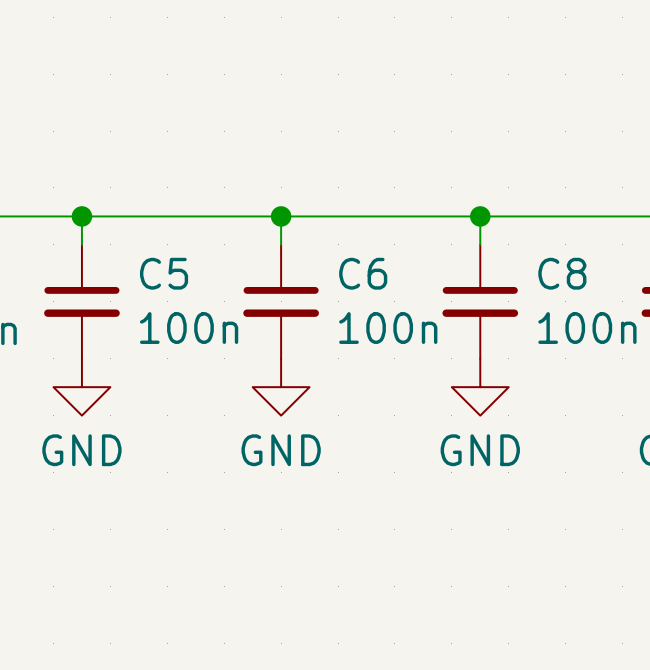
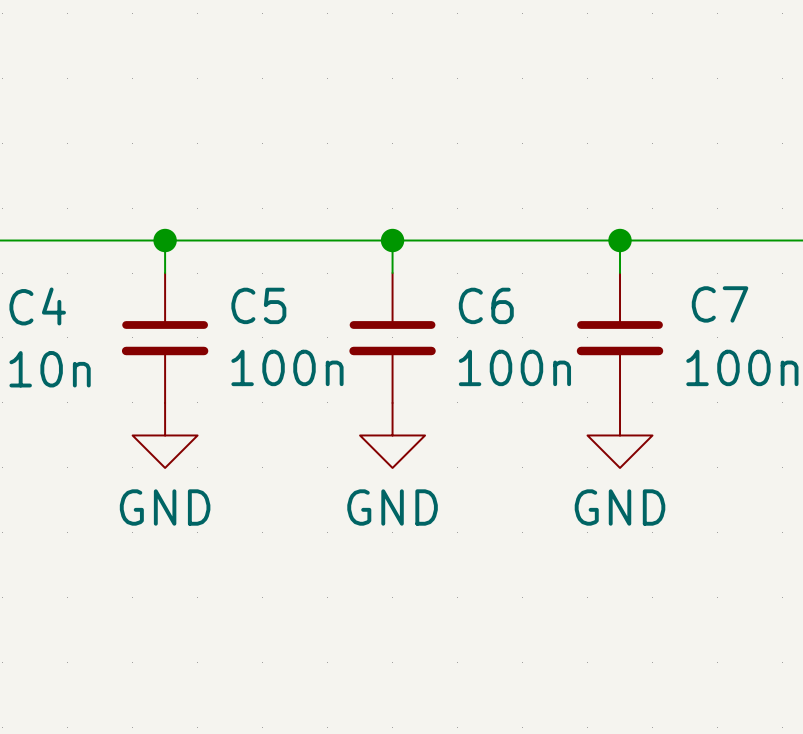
C8 name: C8 (562, 273) -> C7 (720, 304)

